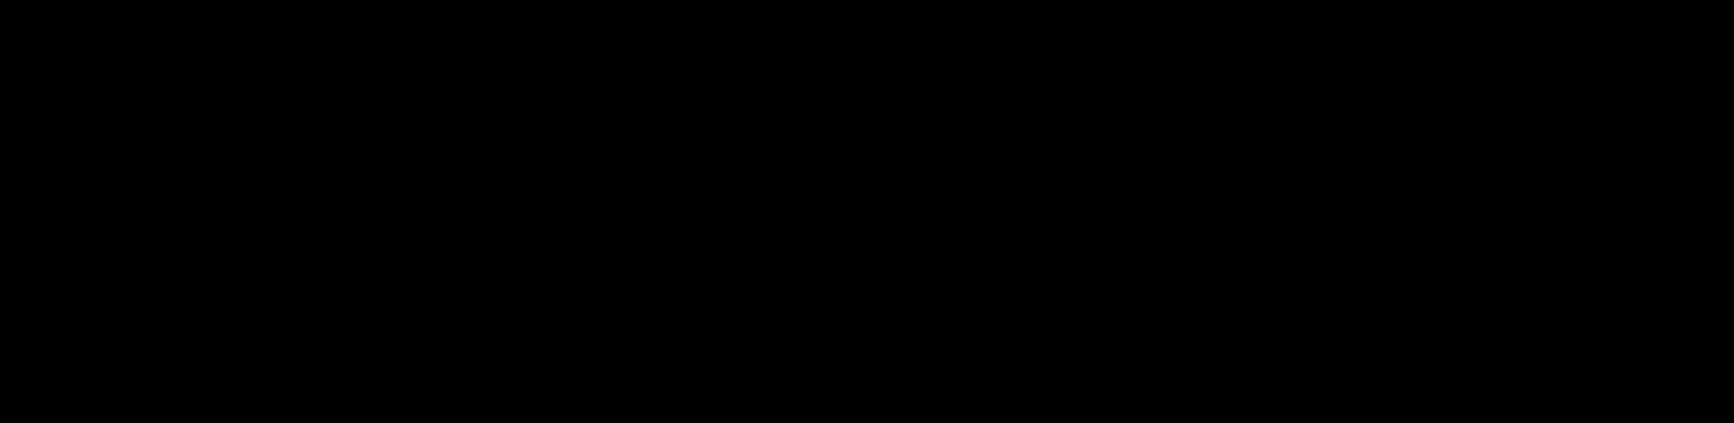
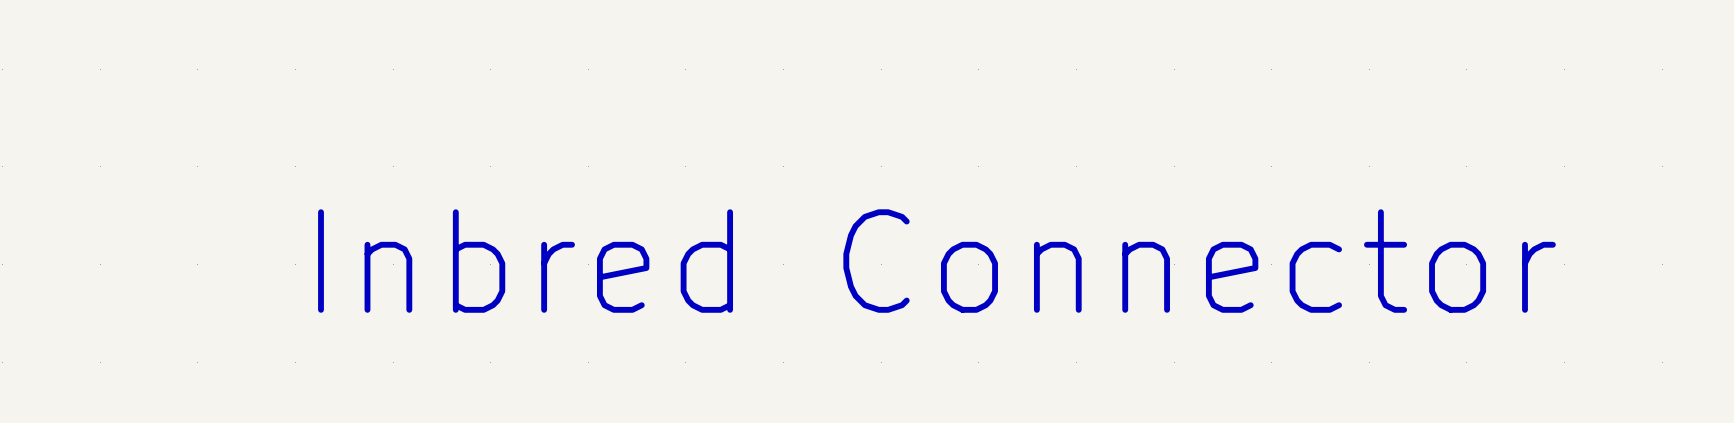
text: none -> Inbred Connector (936, 261)

